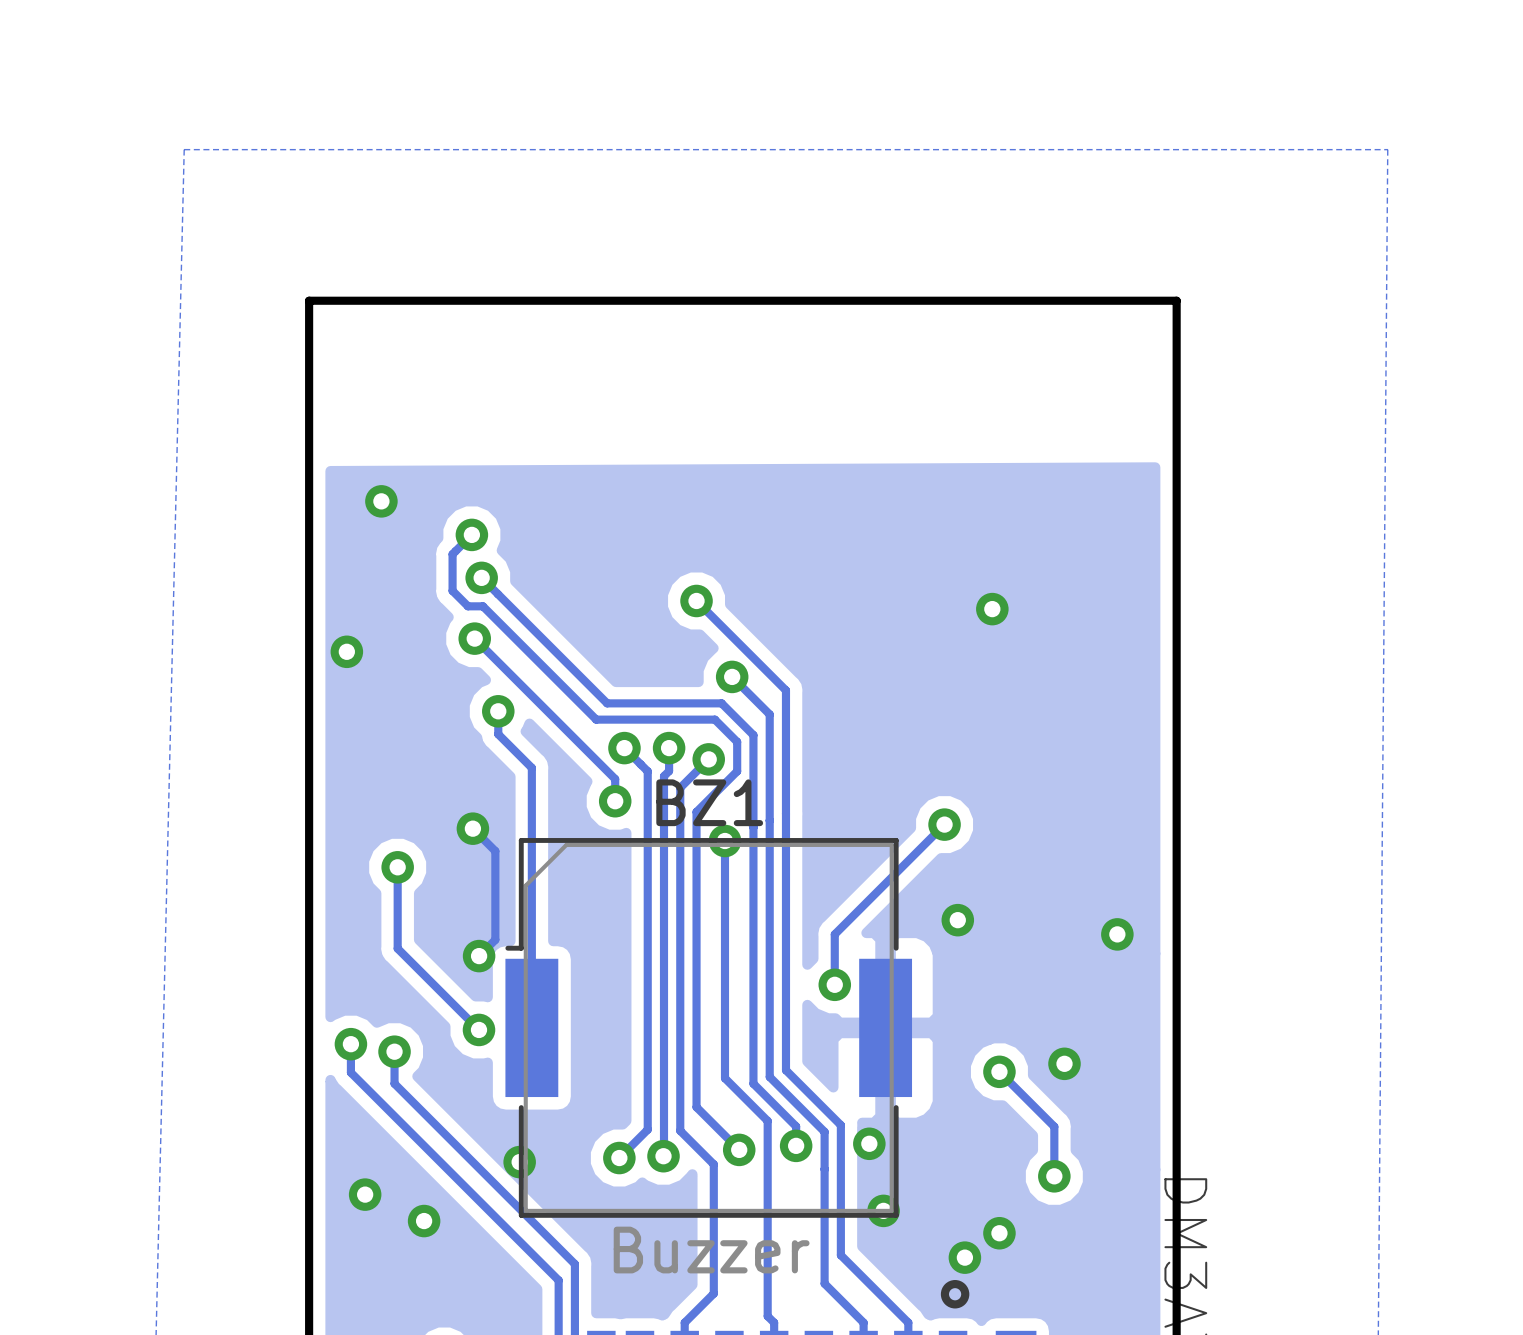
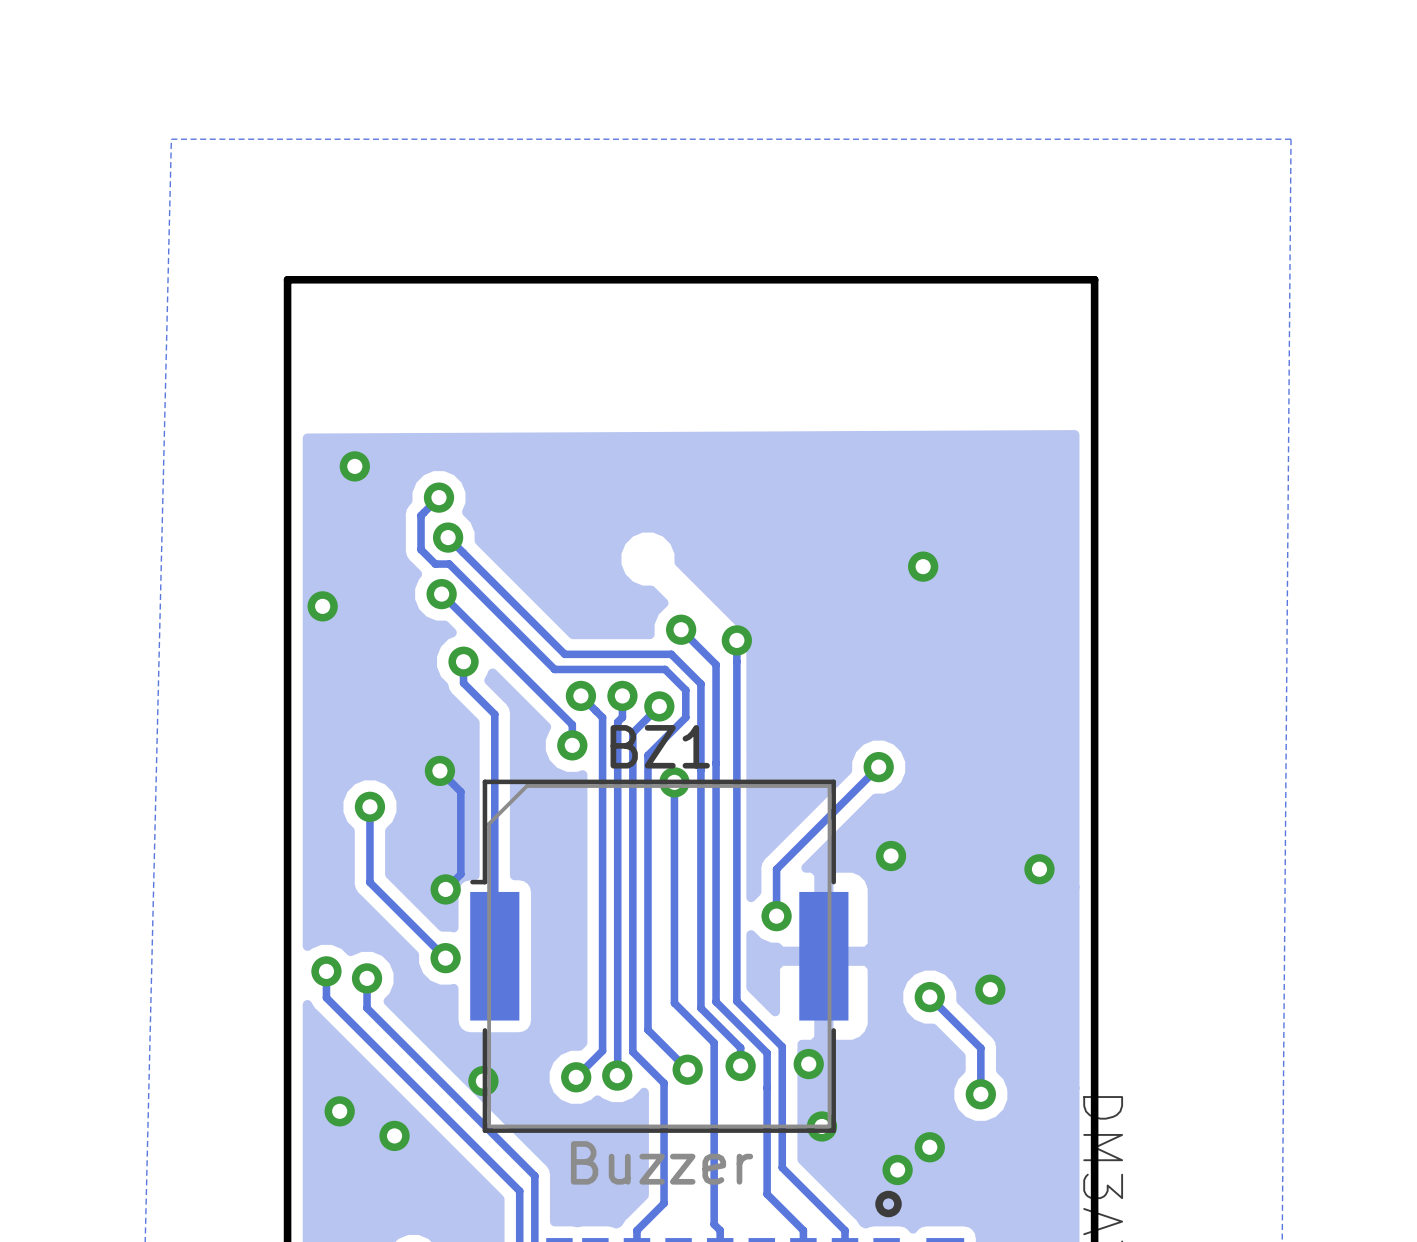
track: (696, 600) (785, 690) (785, 1070) (792, 1076) -> (736, 640) (736, 1001)
via position: (696, 600) -> (736, 640)

